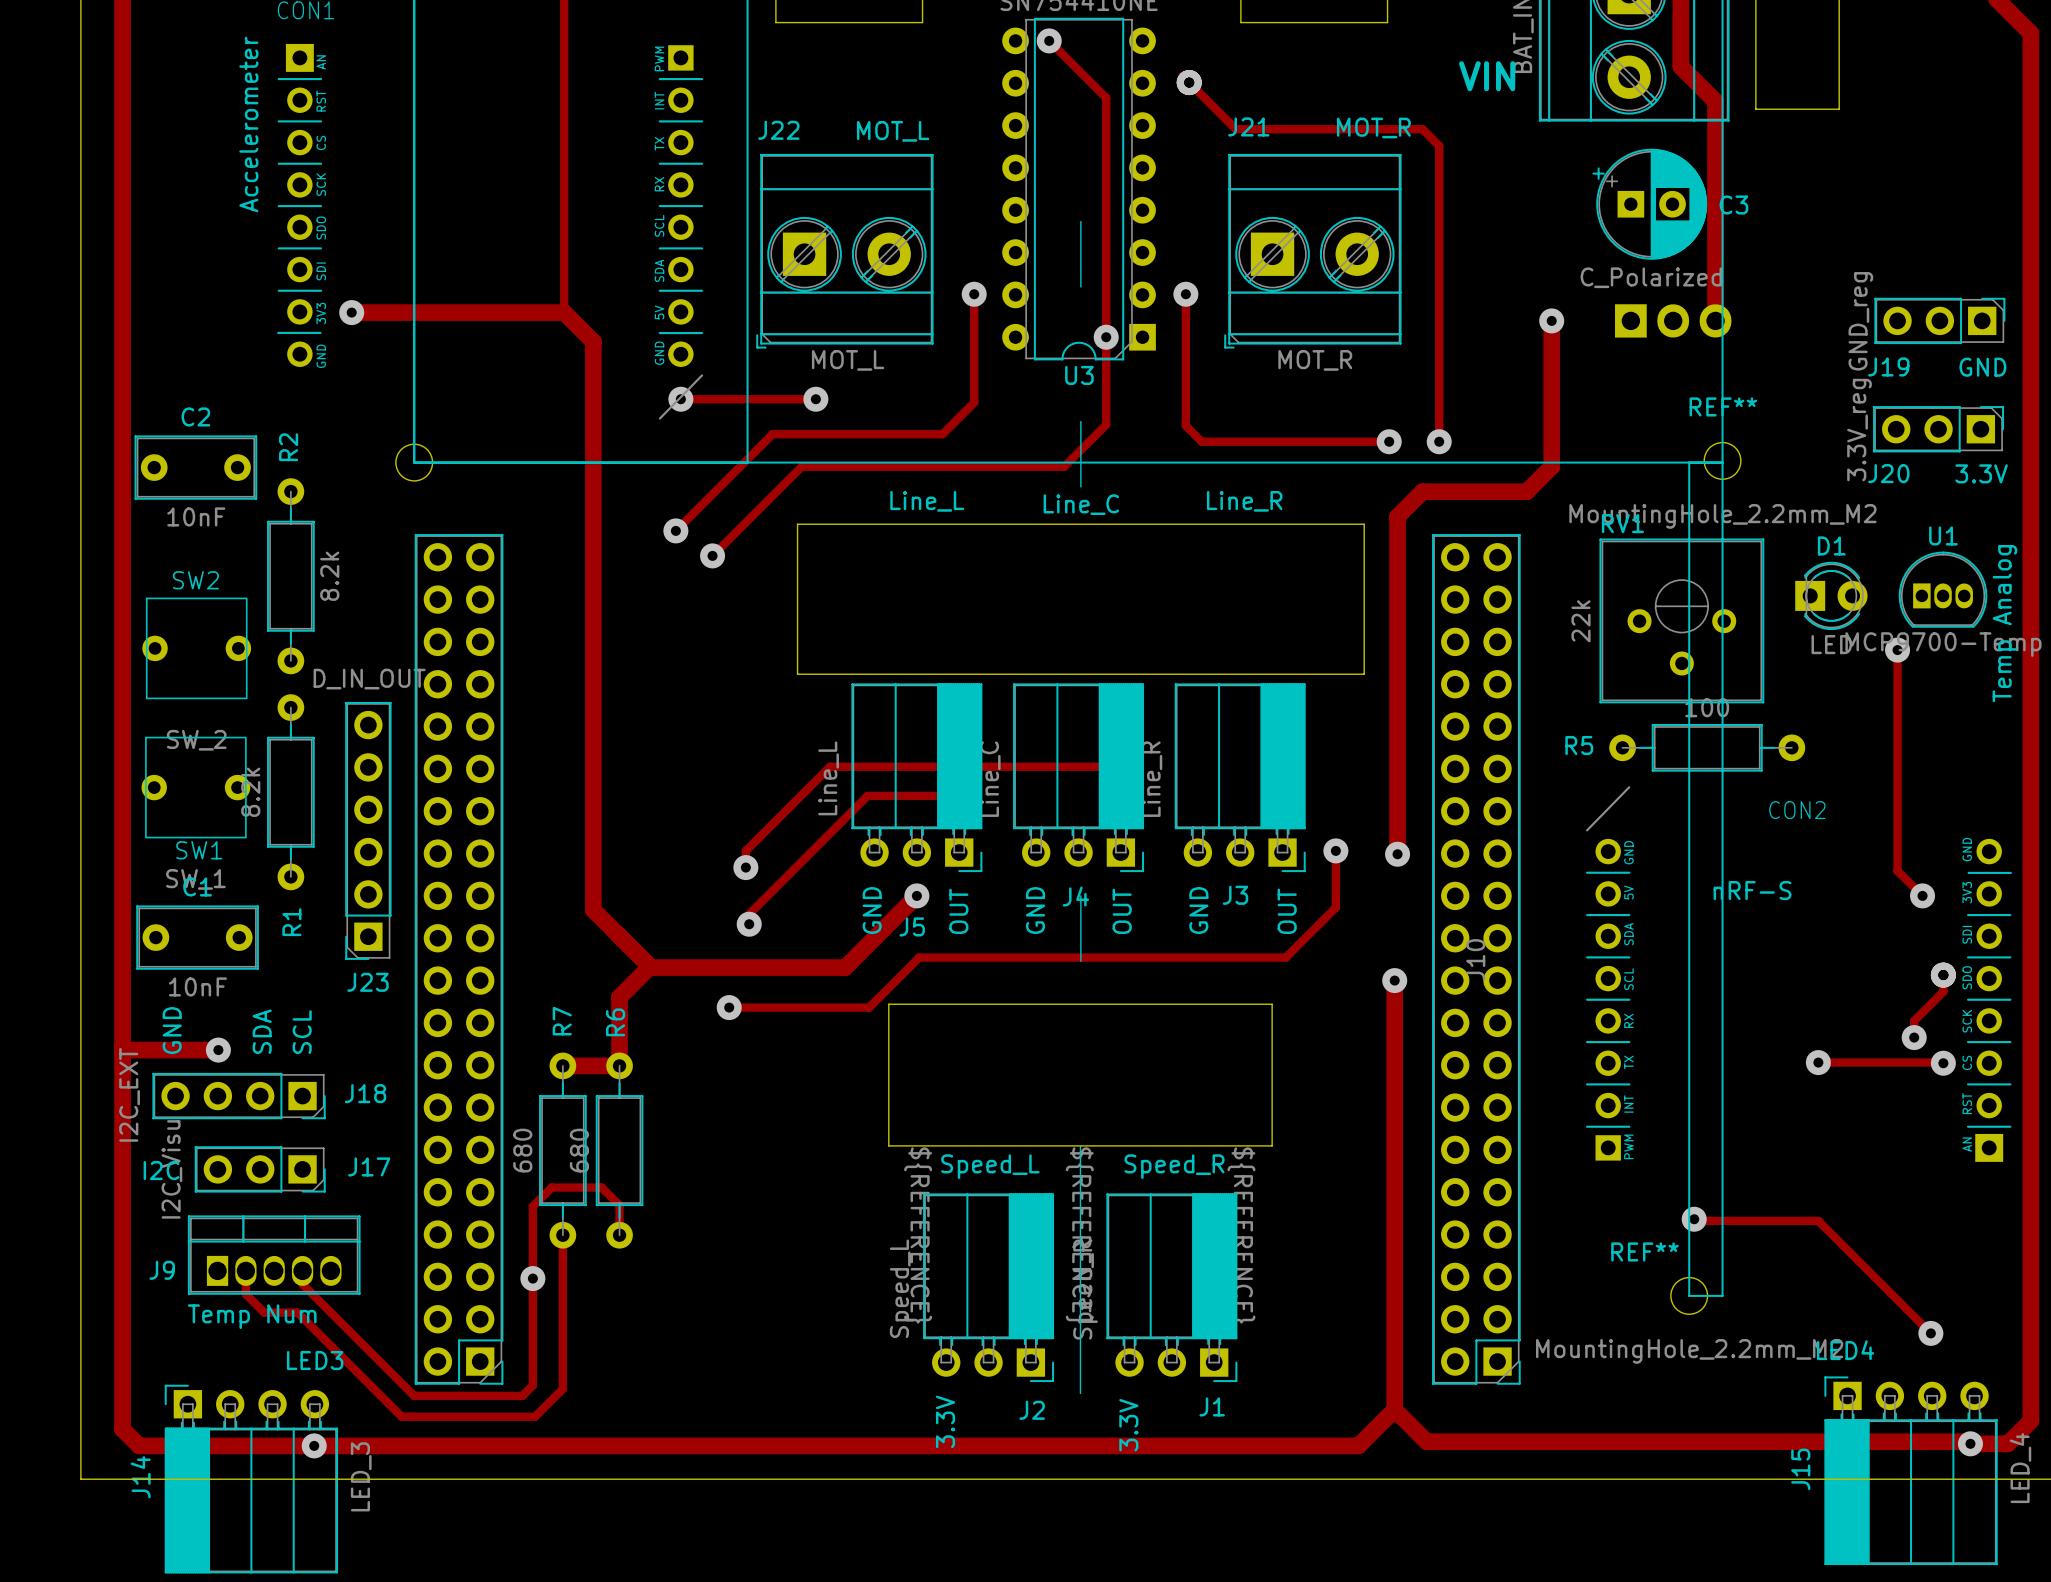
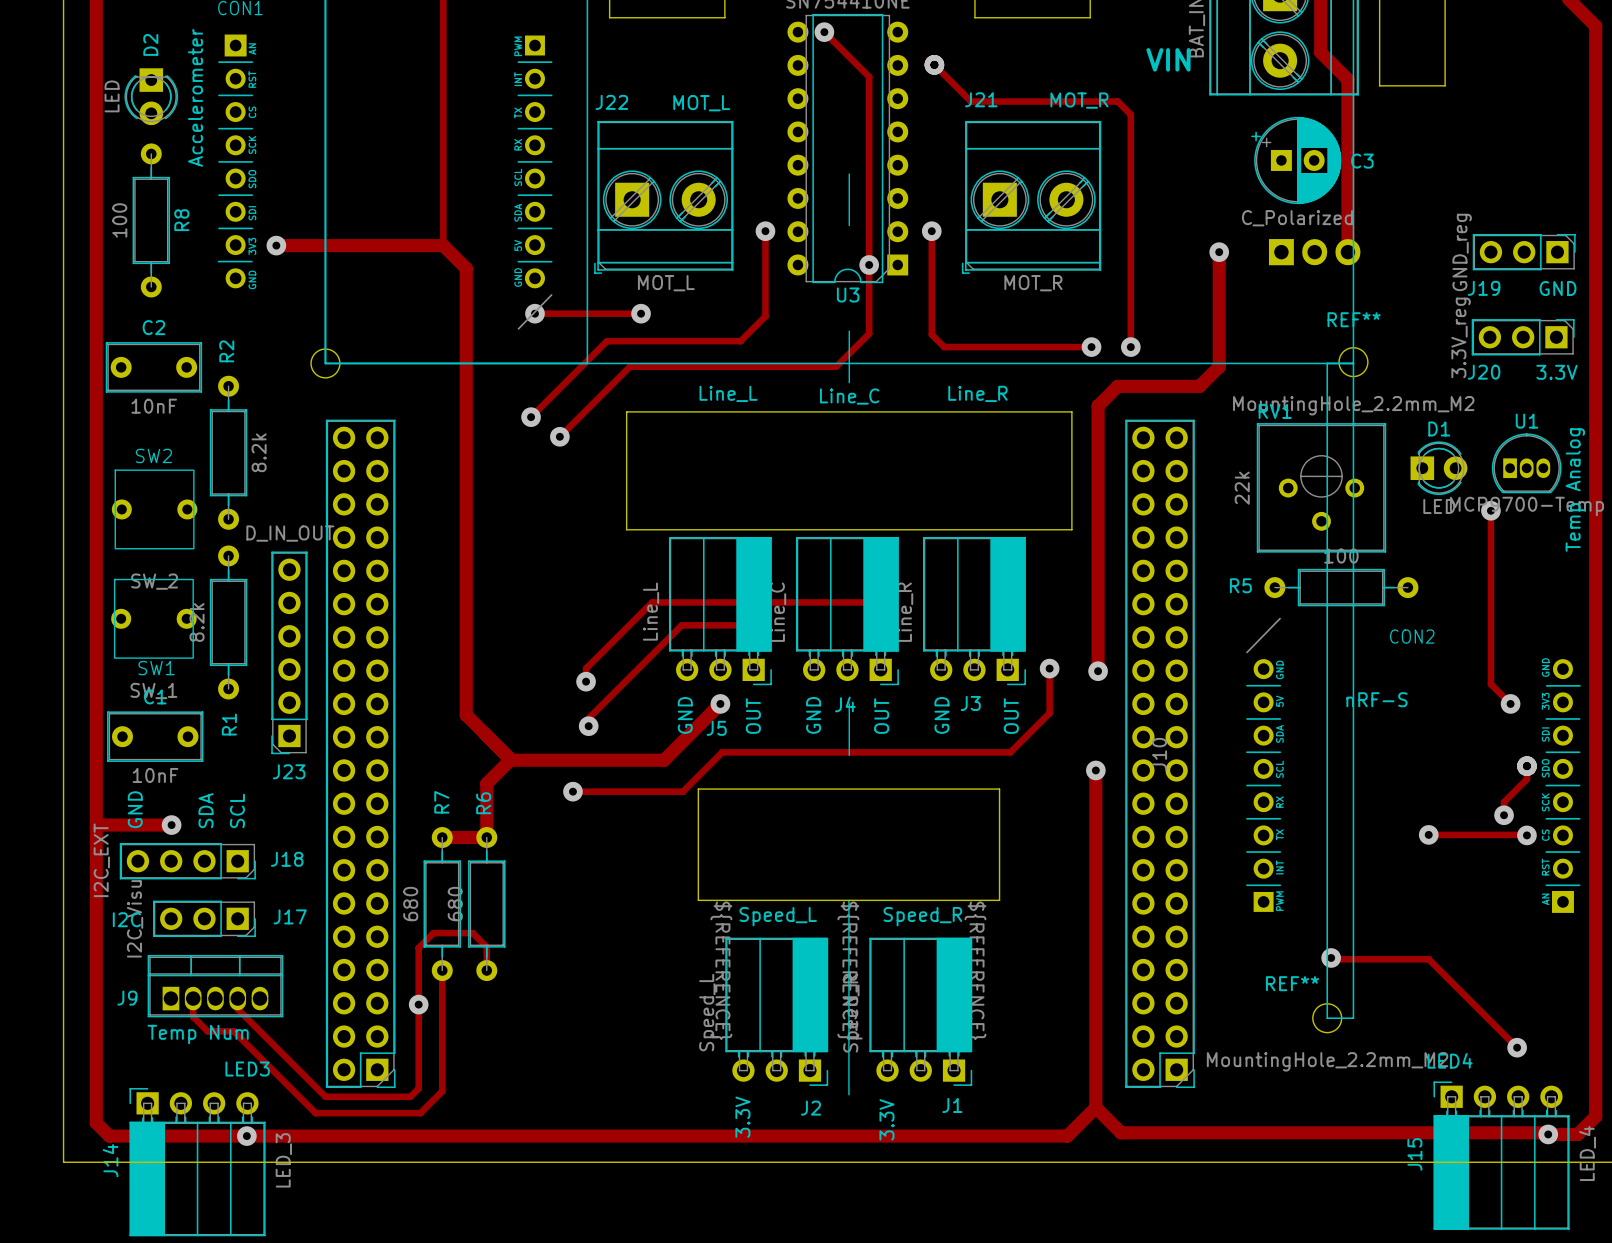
D2: none -> LED (151, 96)
R8: none -> 100 (151, 220)

